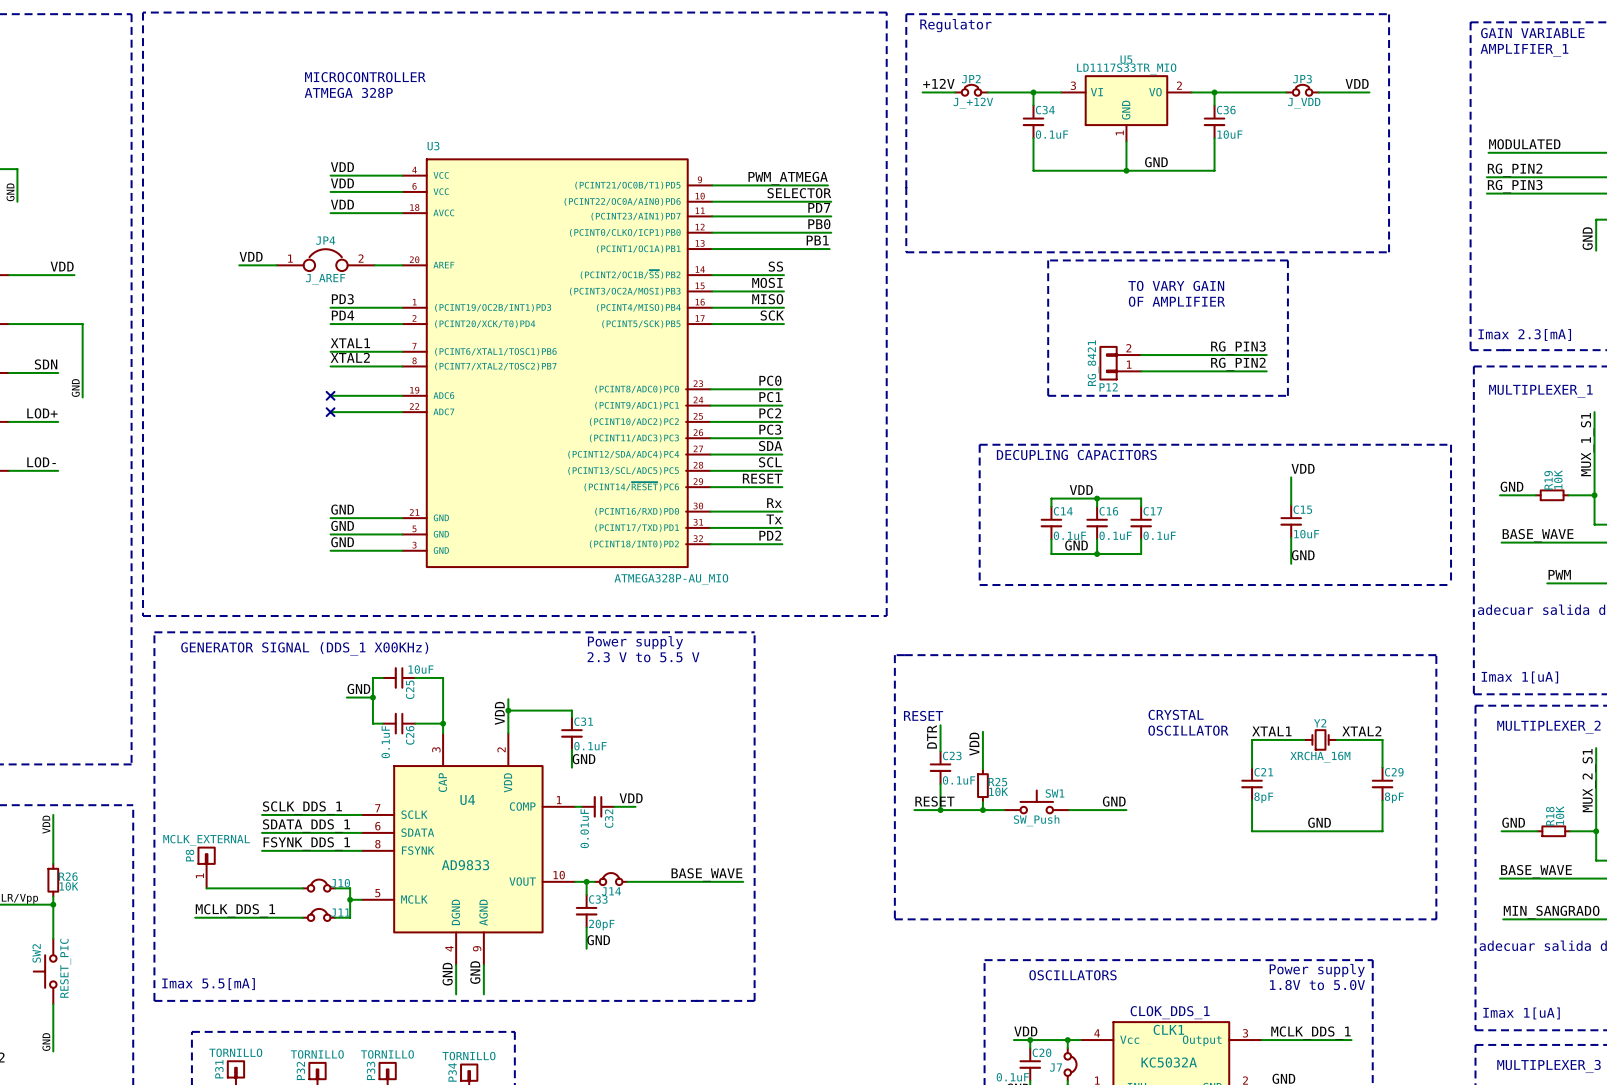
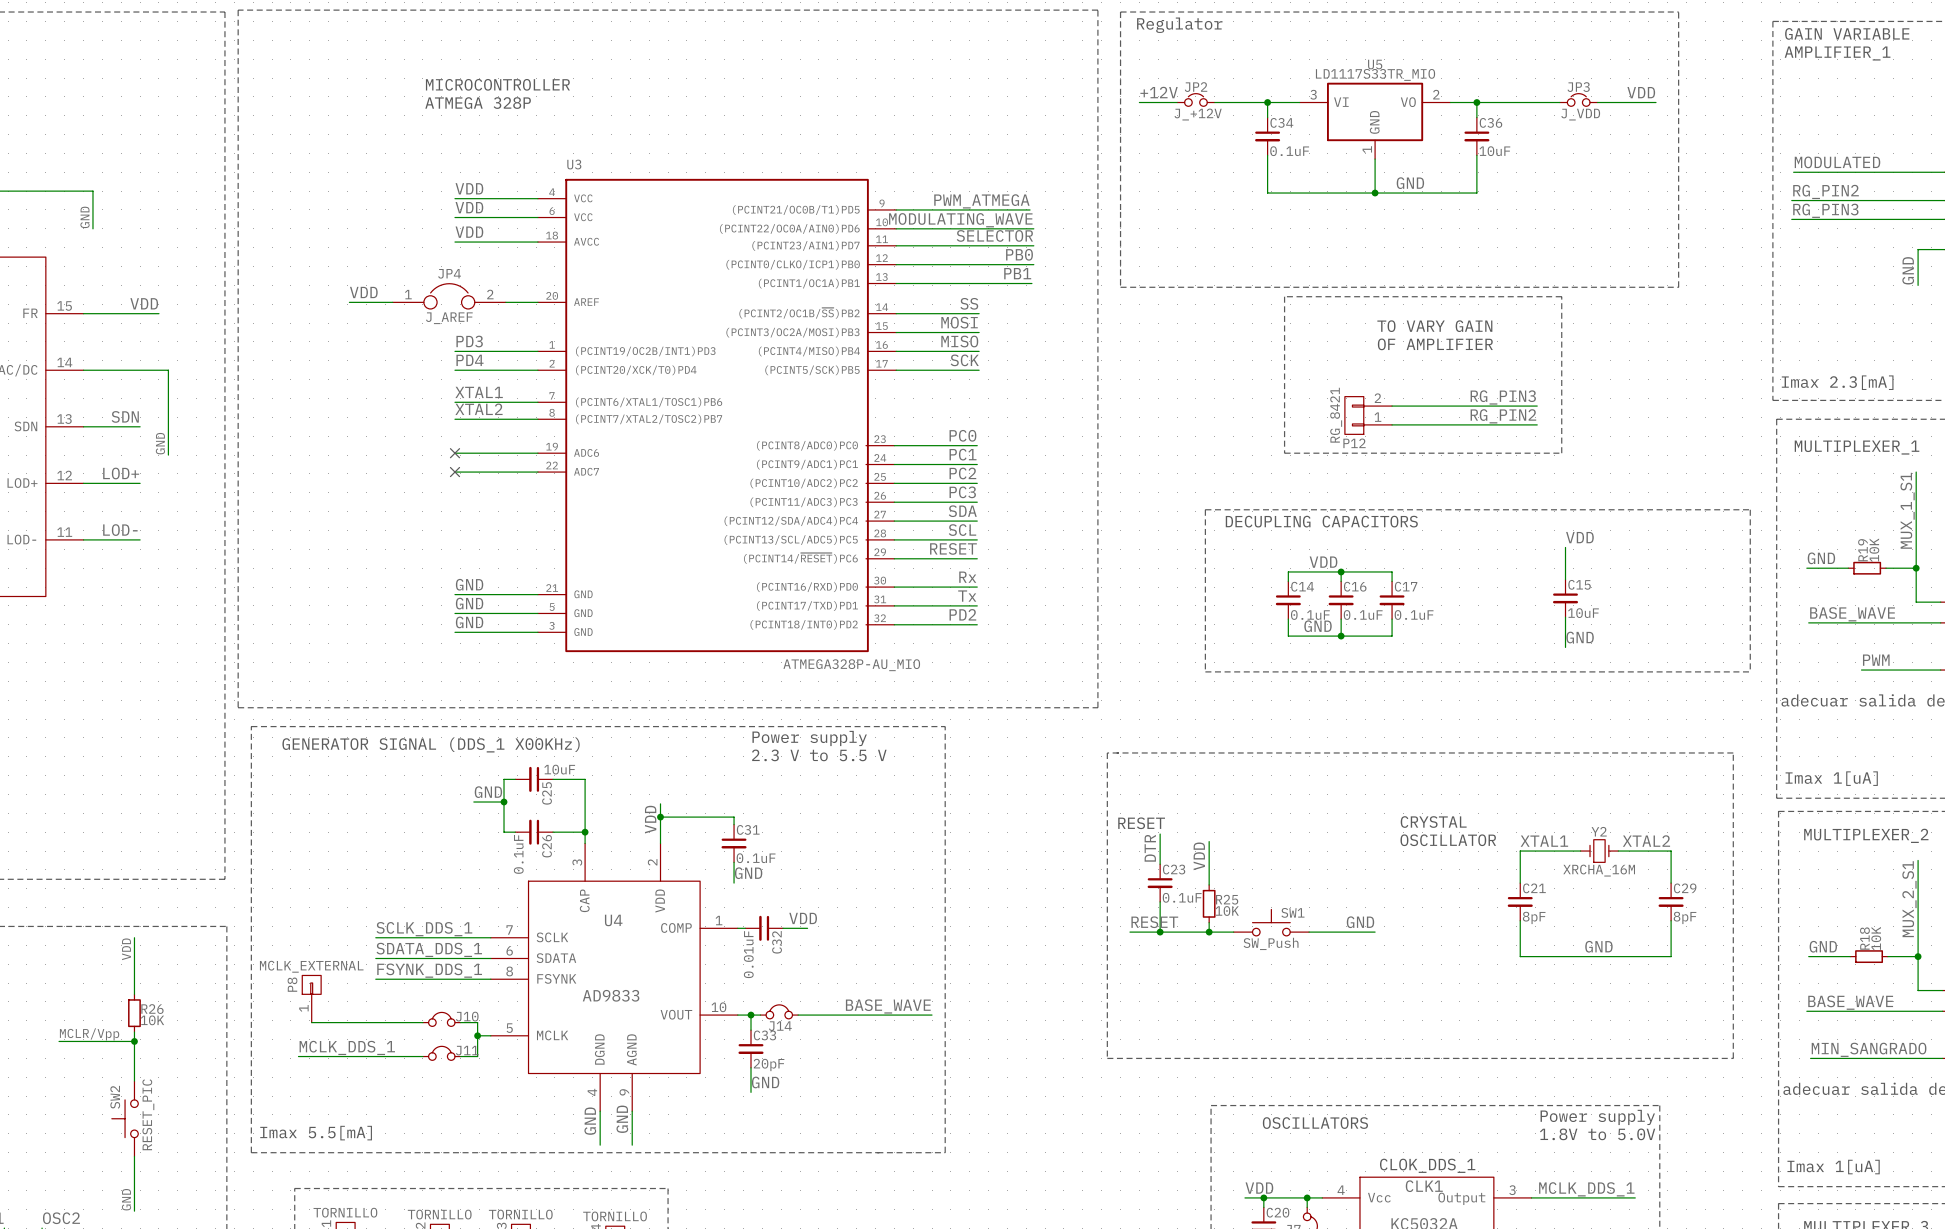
label: SELECTOR (799, 193) -> MODULATING_WAVE (960, 220)
label: PD7 (819, 207) -> SELECTOR (994, 235)

